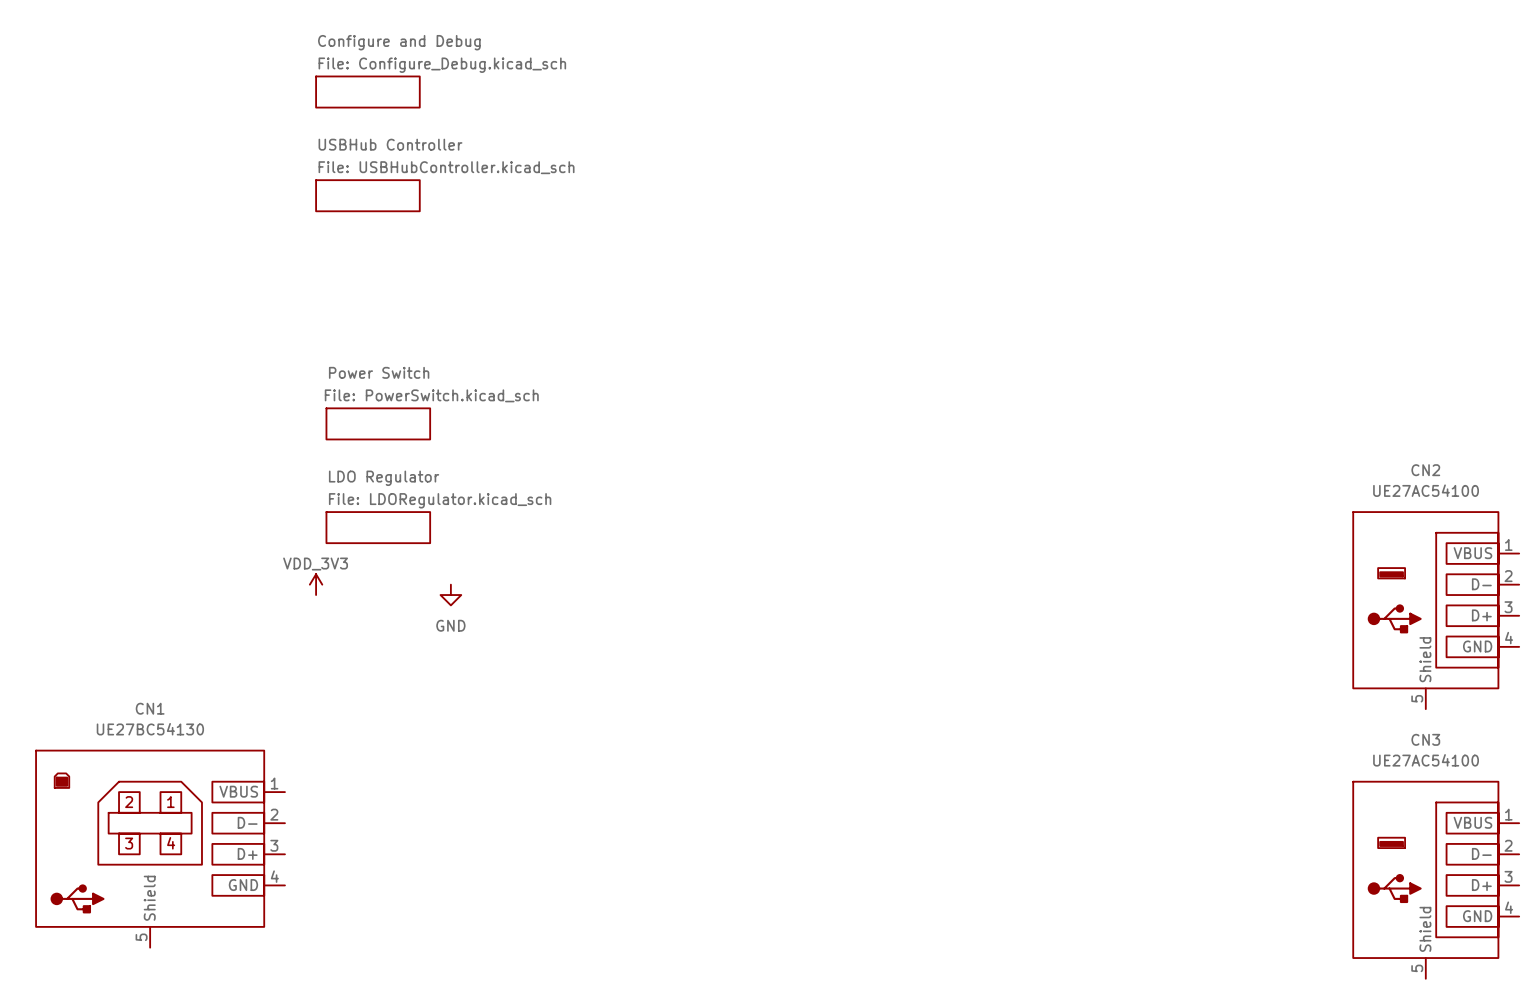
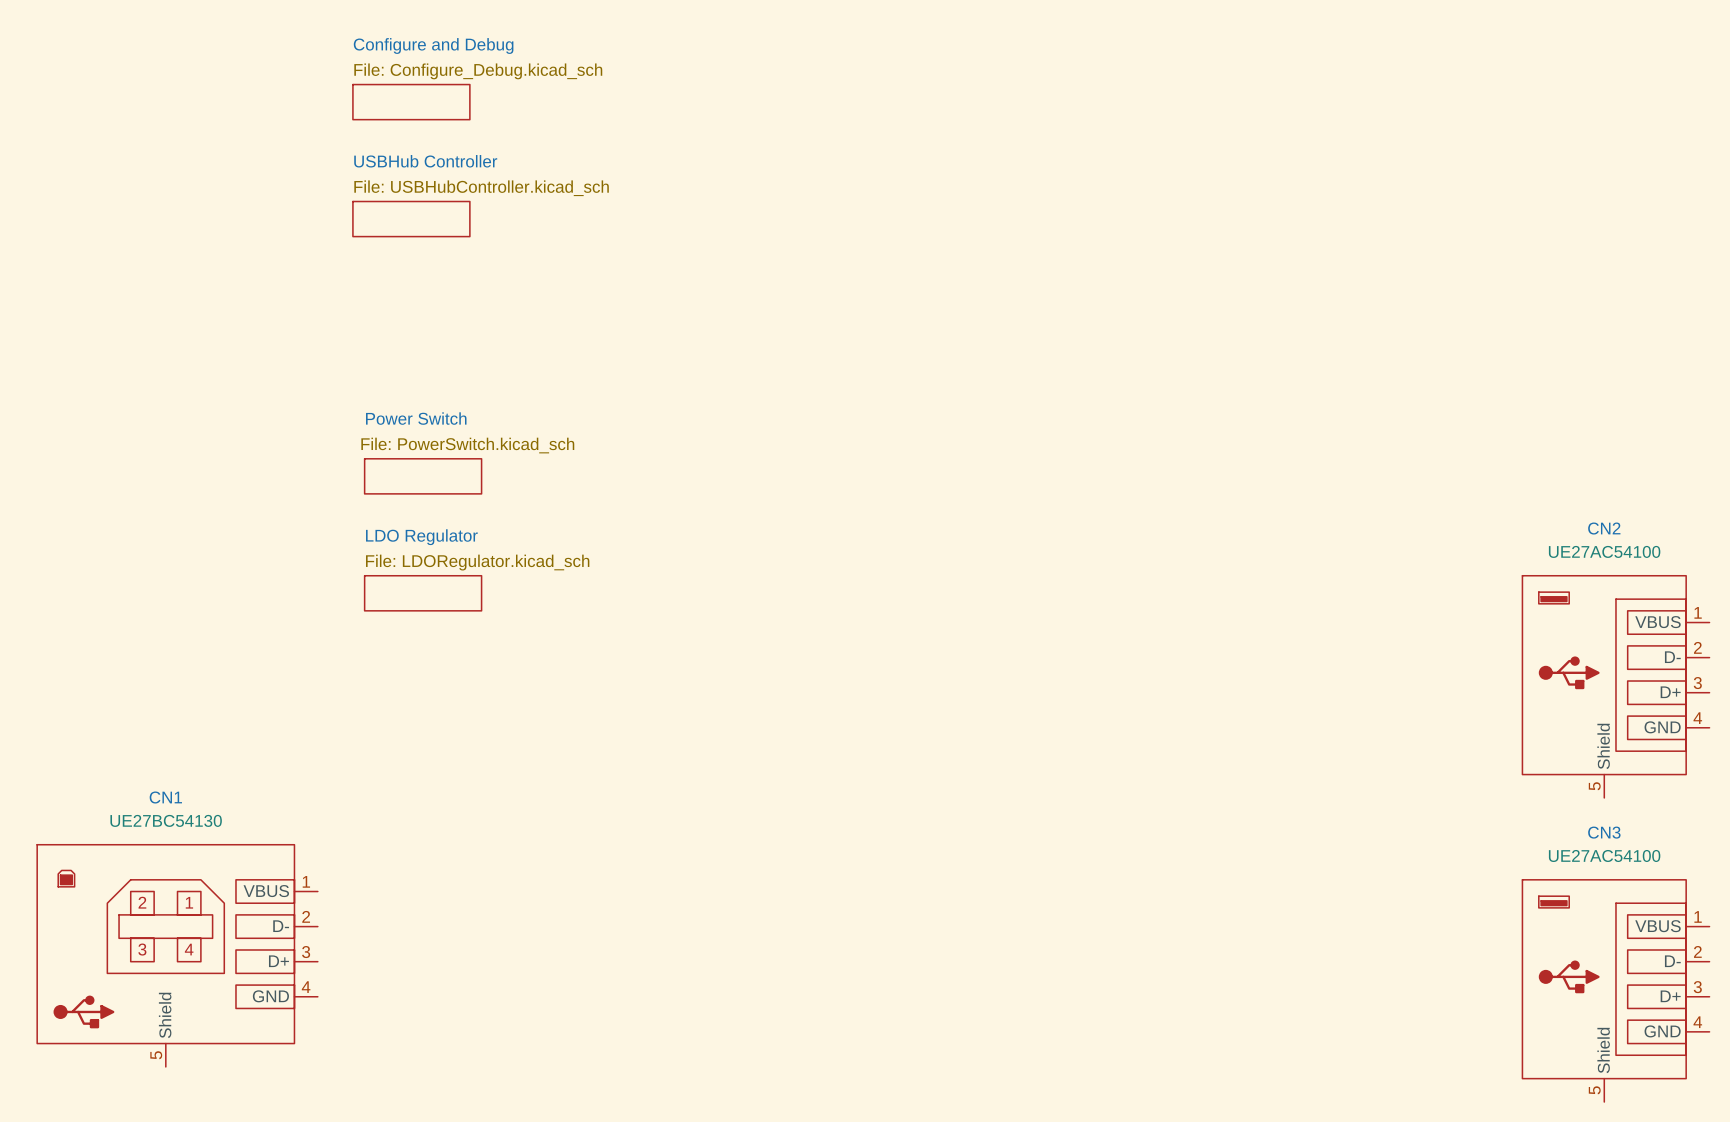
CN2 symbol: [1353, 512, 1520, 710] -> [1522, 575, 1710, 798]
power symbol: VDD_3V3 (316, 584) -> none
power symbol: GND (450, 595) -> none
CN3 symbol: [1353, 781, 1520, 979] -> [1522, 879, 1710, 1103]

